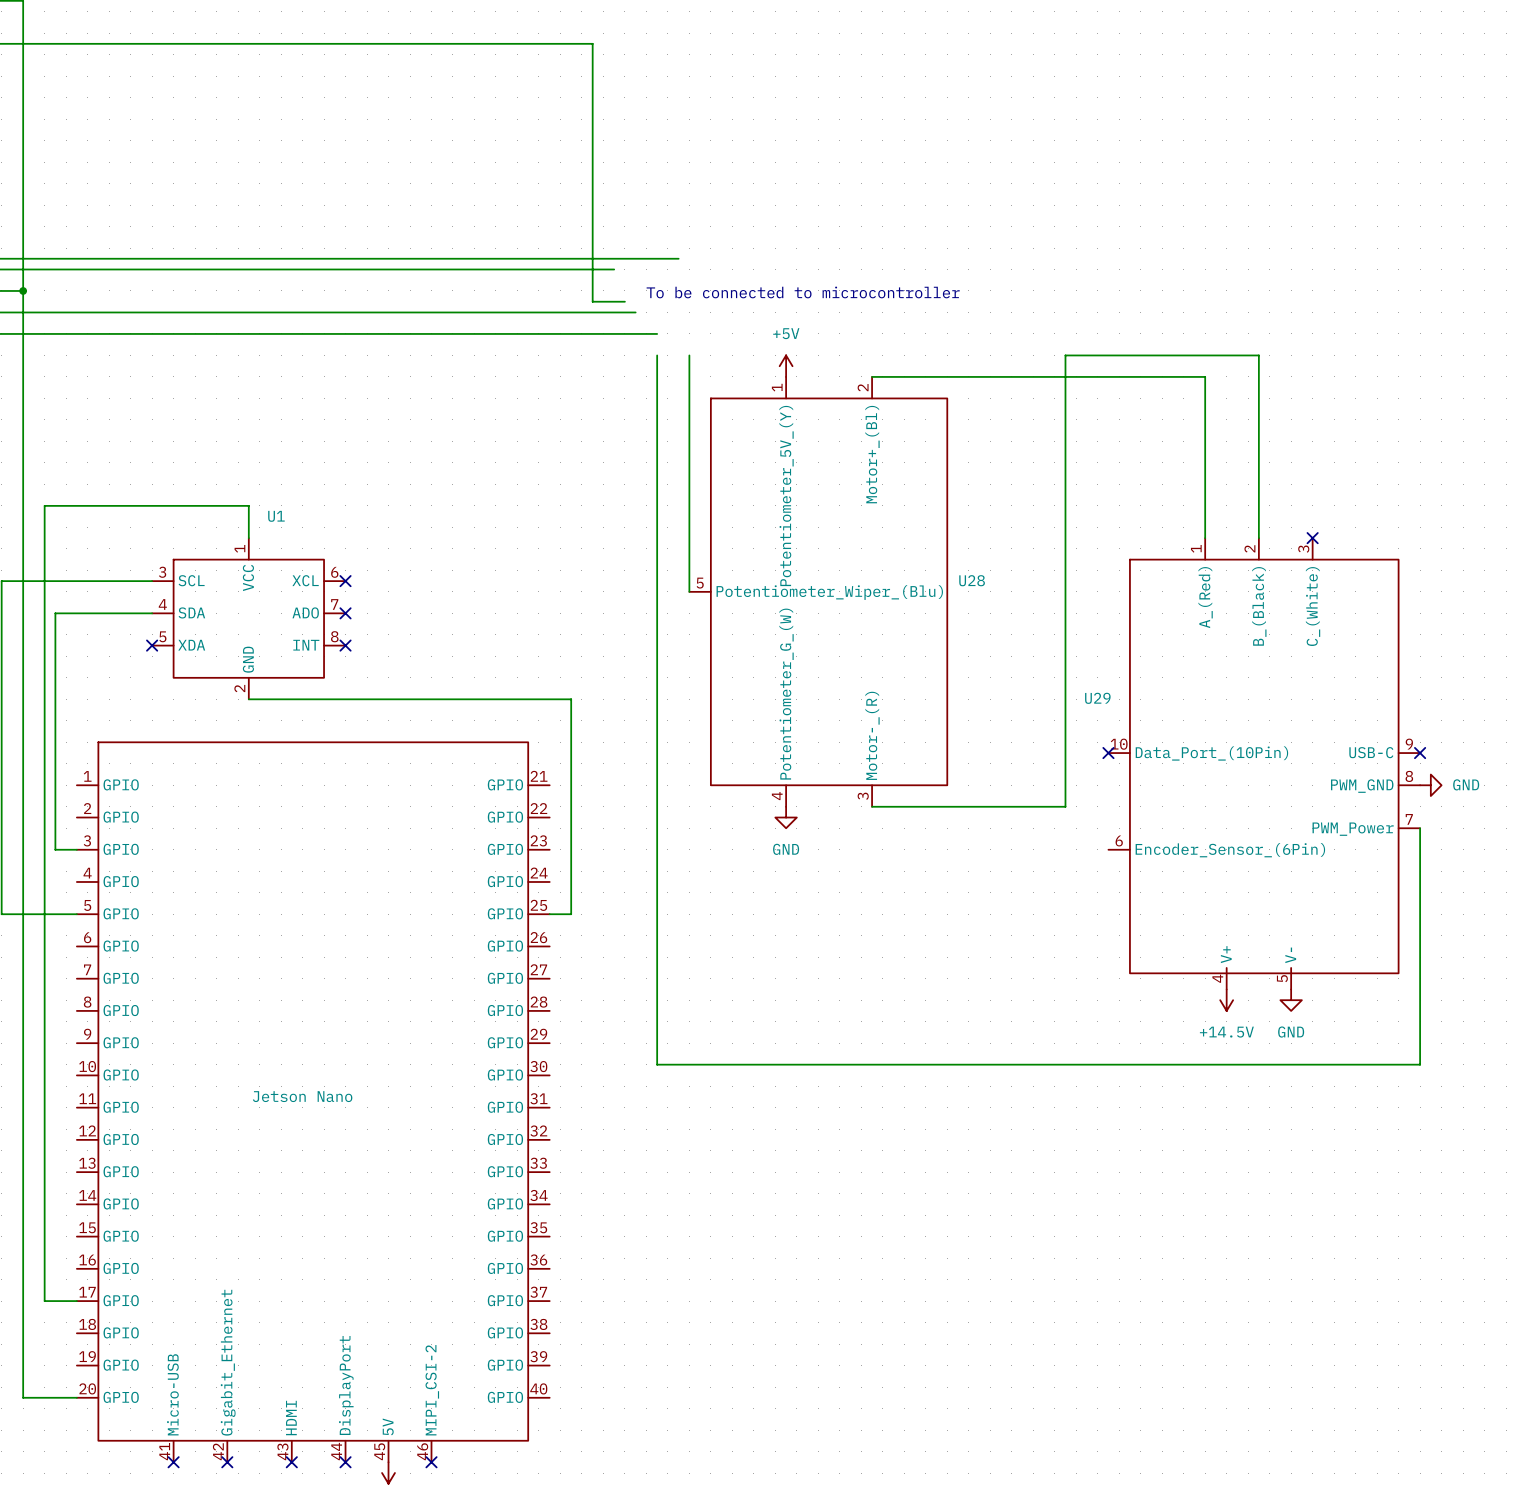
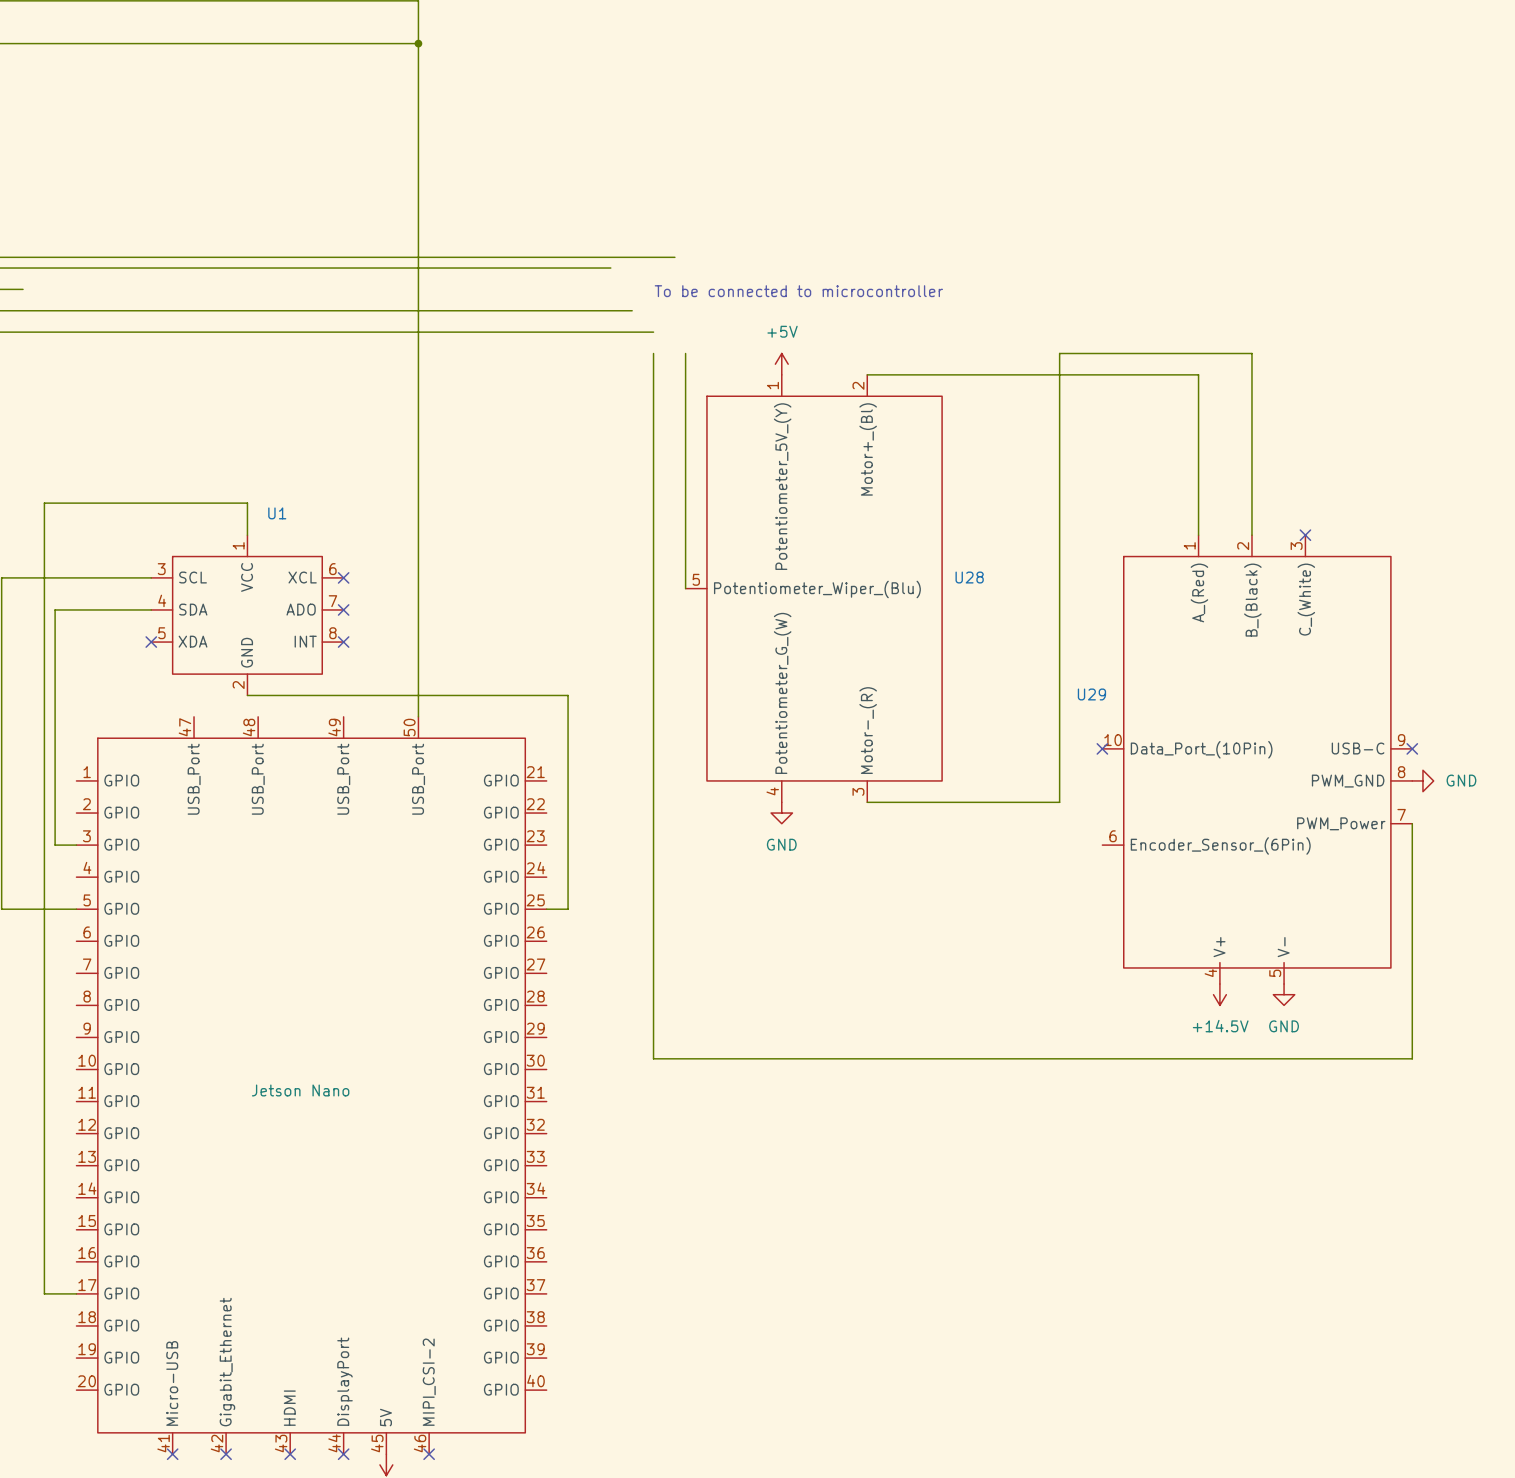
wire: (23, 0) (23, 1397) (76, 1397) -> (23, 0) (418, 0) (418, 716)
wire: (420, 43) (592, 43) (592, 301) (624, 301) -> none
junction: none -> (418, 43)
junction: (23, 290) -> none
part: none -> Jetson Nano (311, 1085)
part: Jetson Nano (313, 1102) -> none

